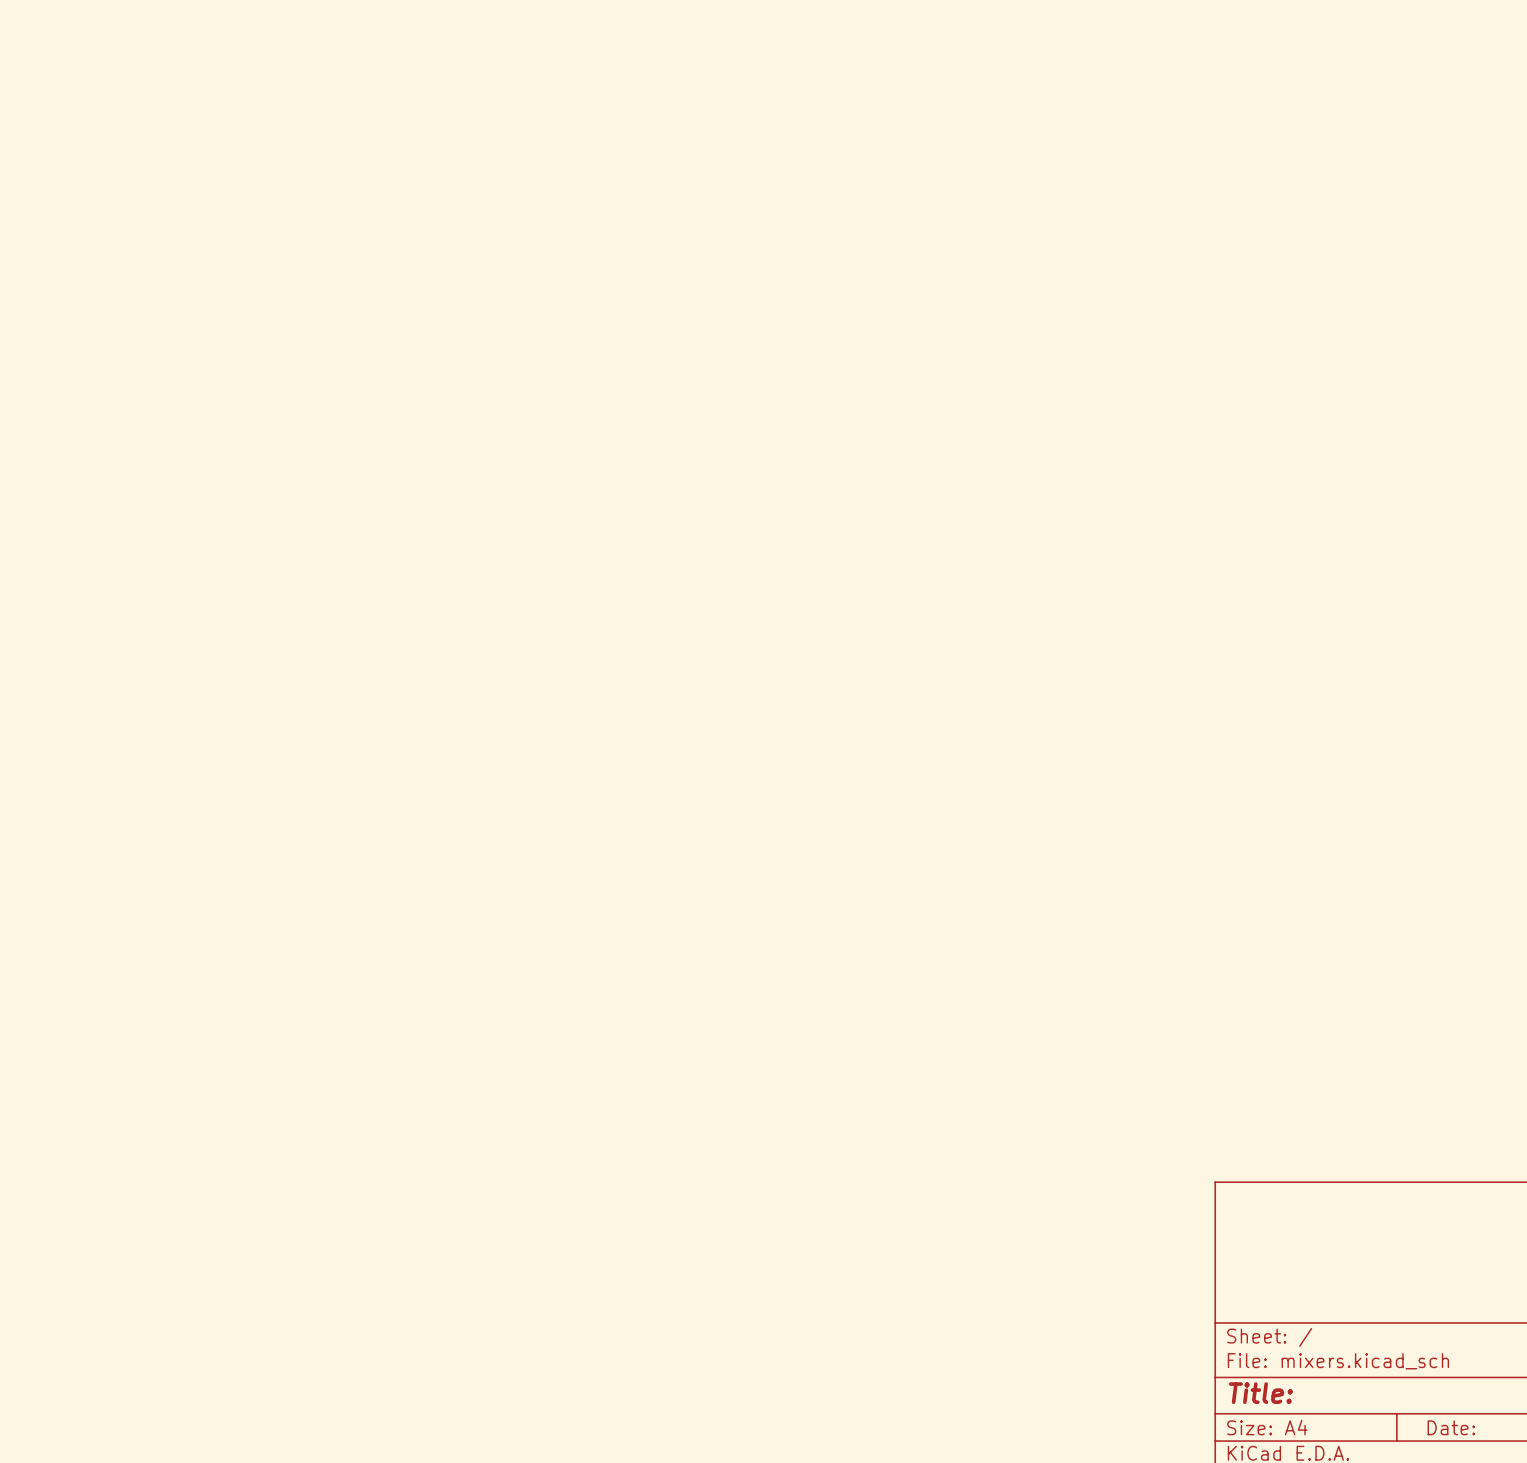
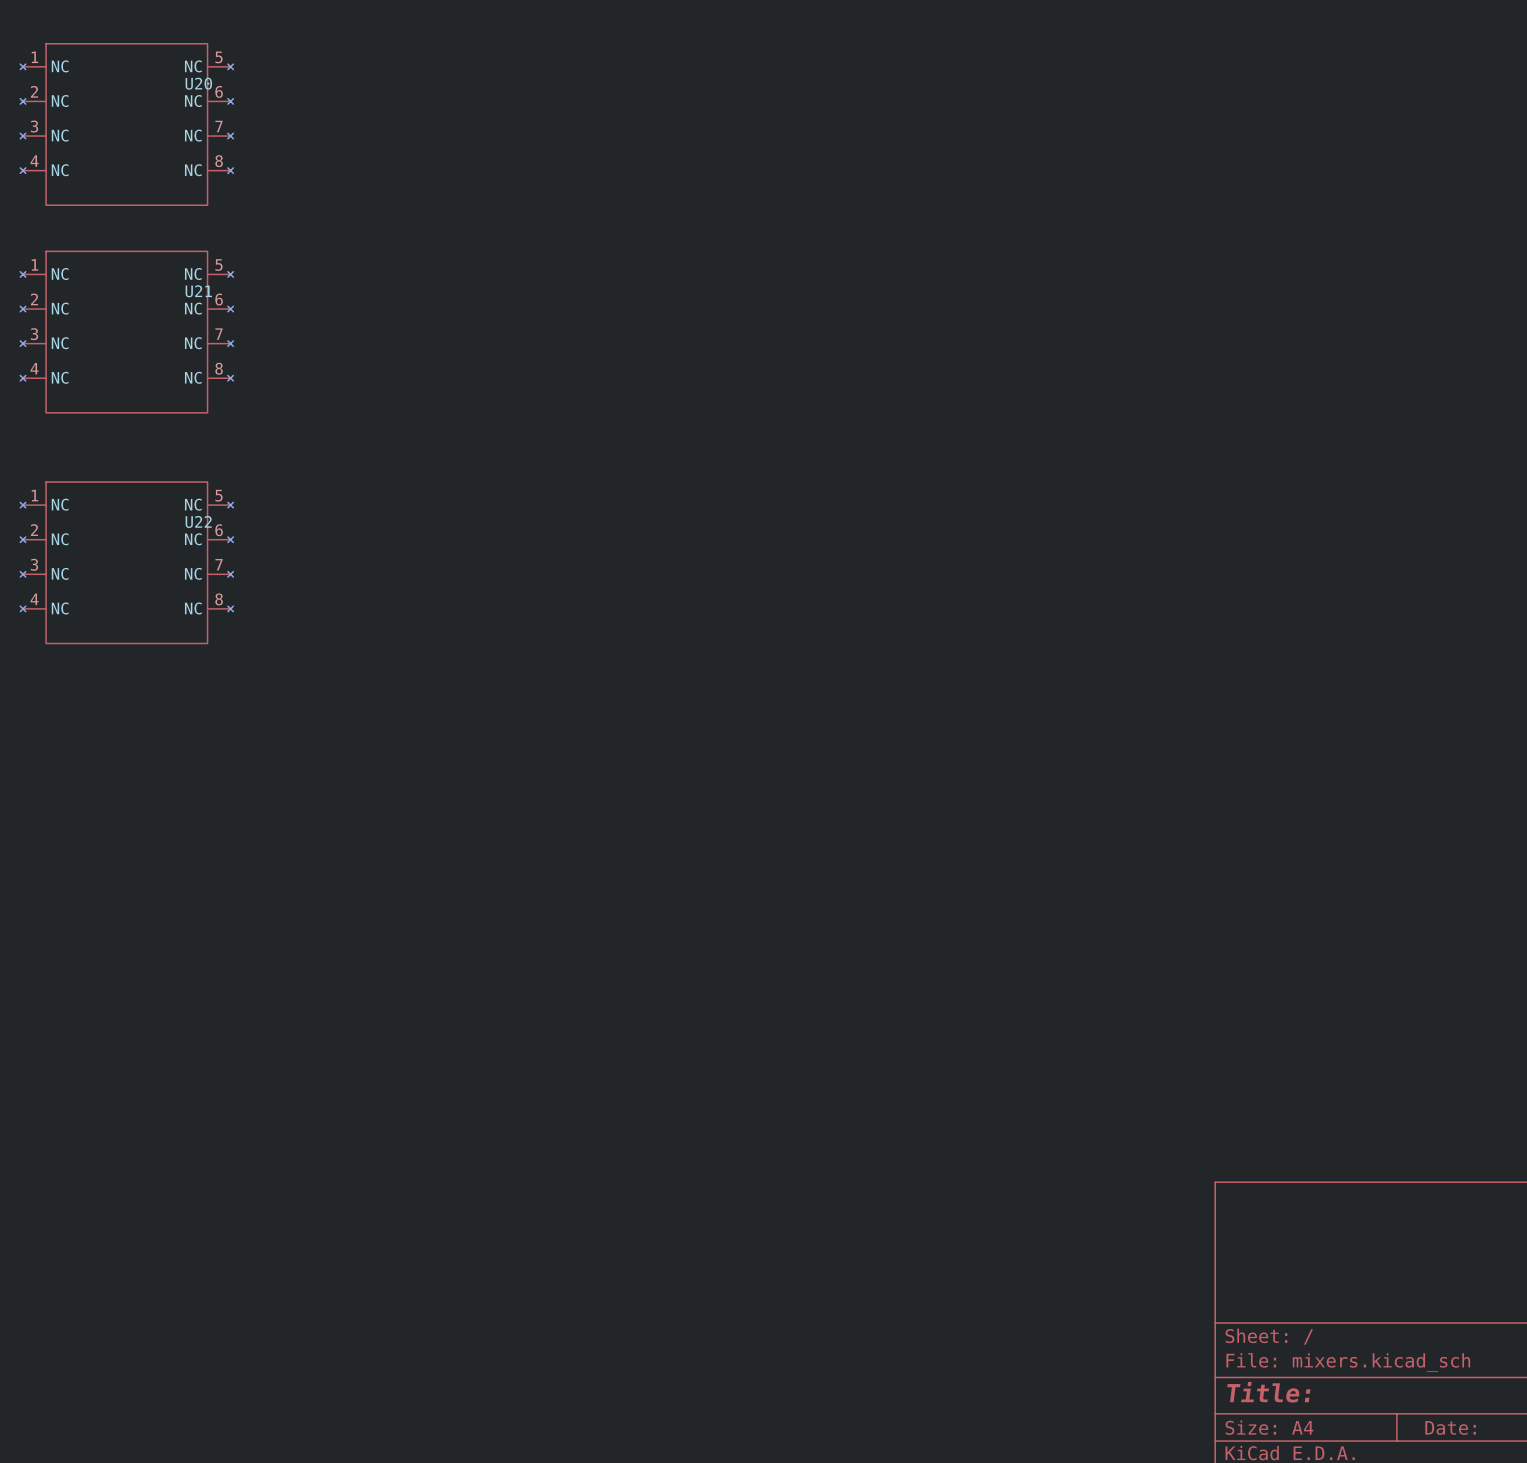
U20: none -> (126, 124)
U21: none -> (126, 332)
U22: none -> (126, 562)

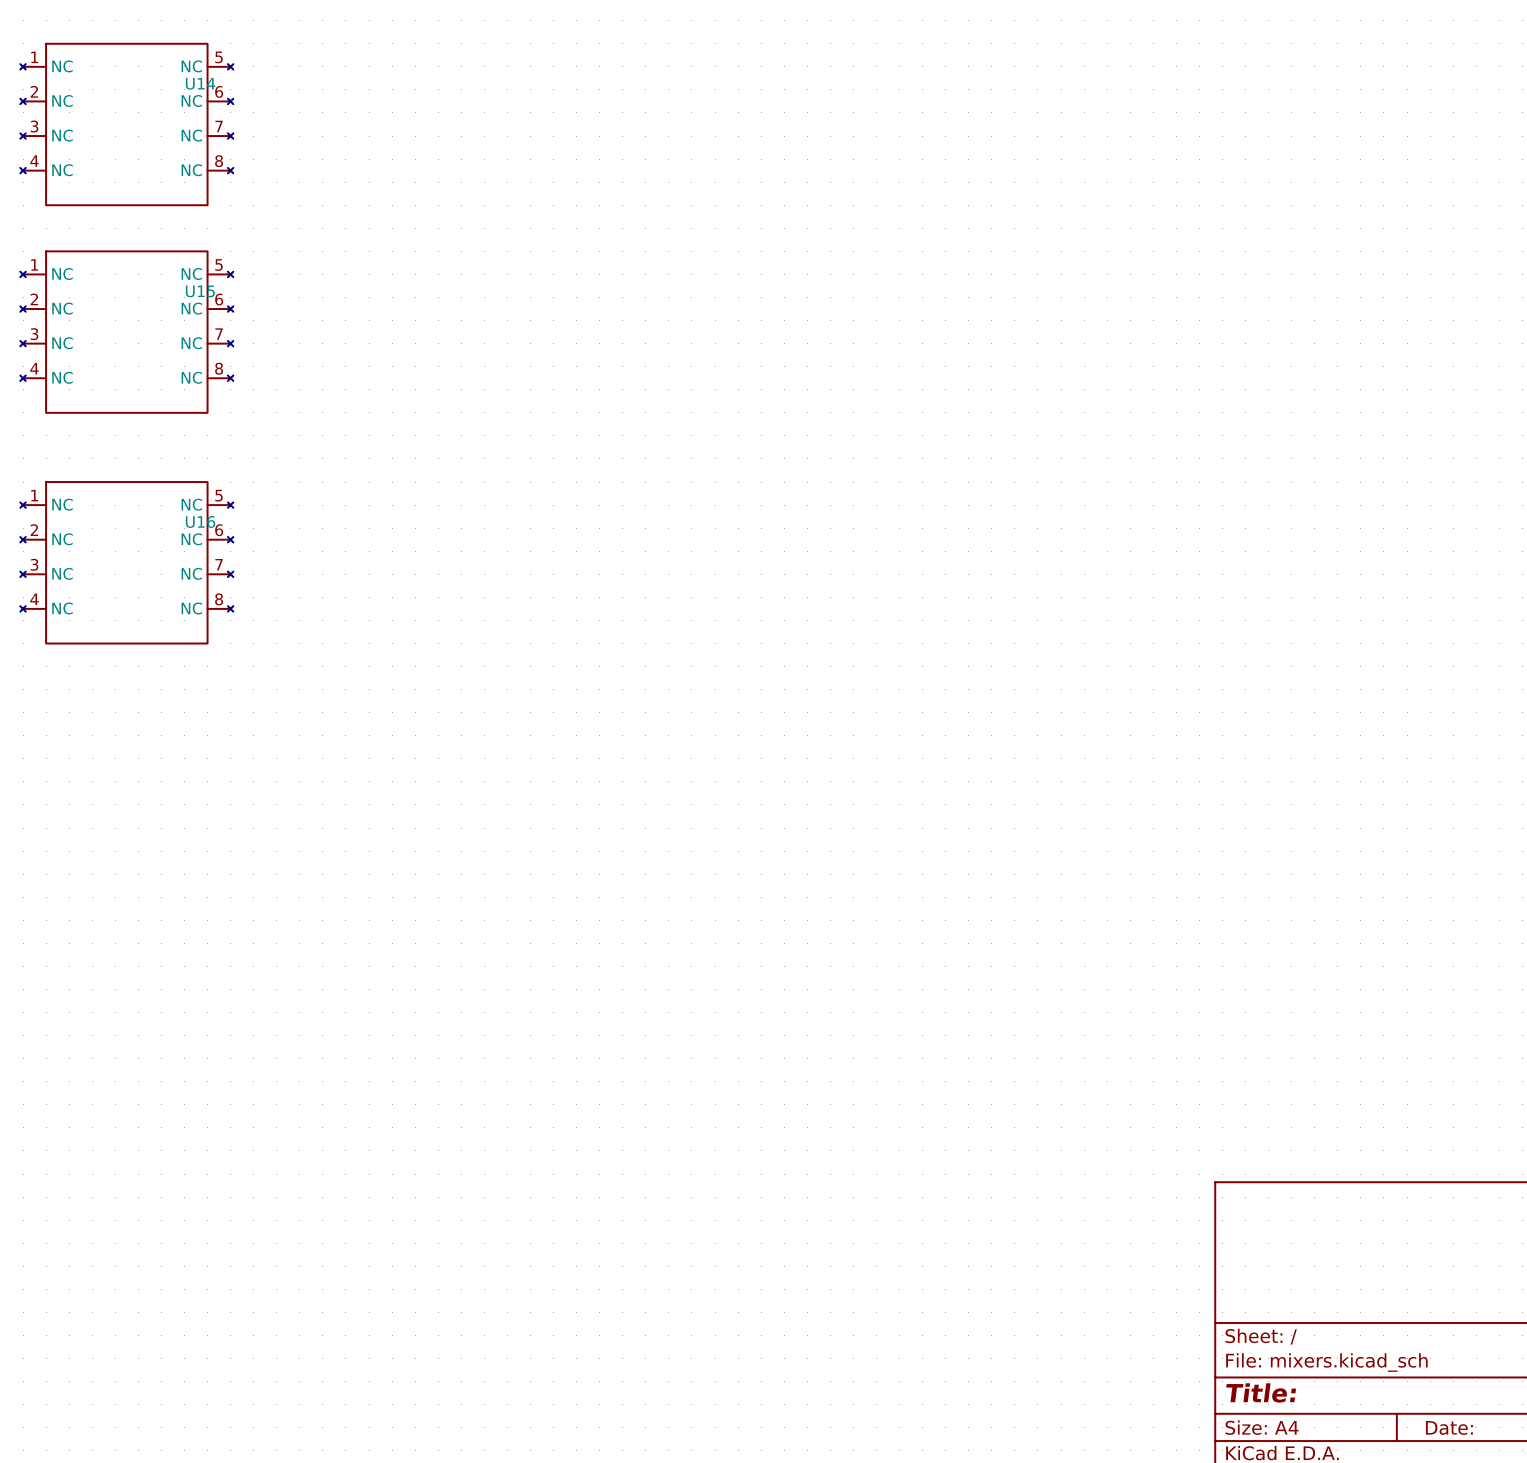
U20 name: U20 (198, 83) -> U14 (200, 83)
U21 name: U21 (198, 291) -> U15 (200, 291)
U22 name: U22 (198, 521) -> U16 (200, 521)

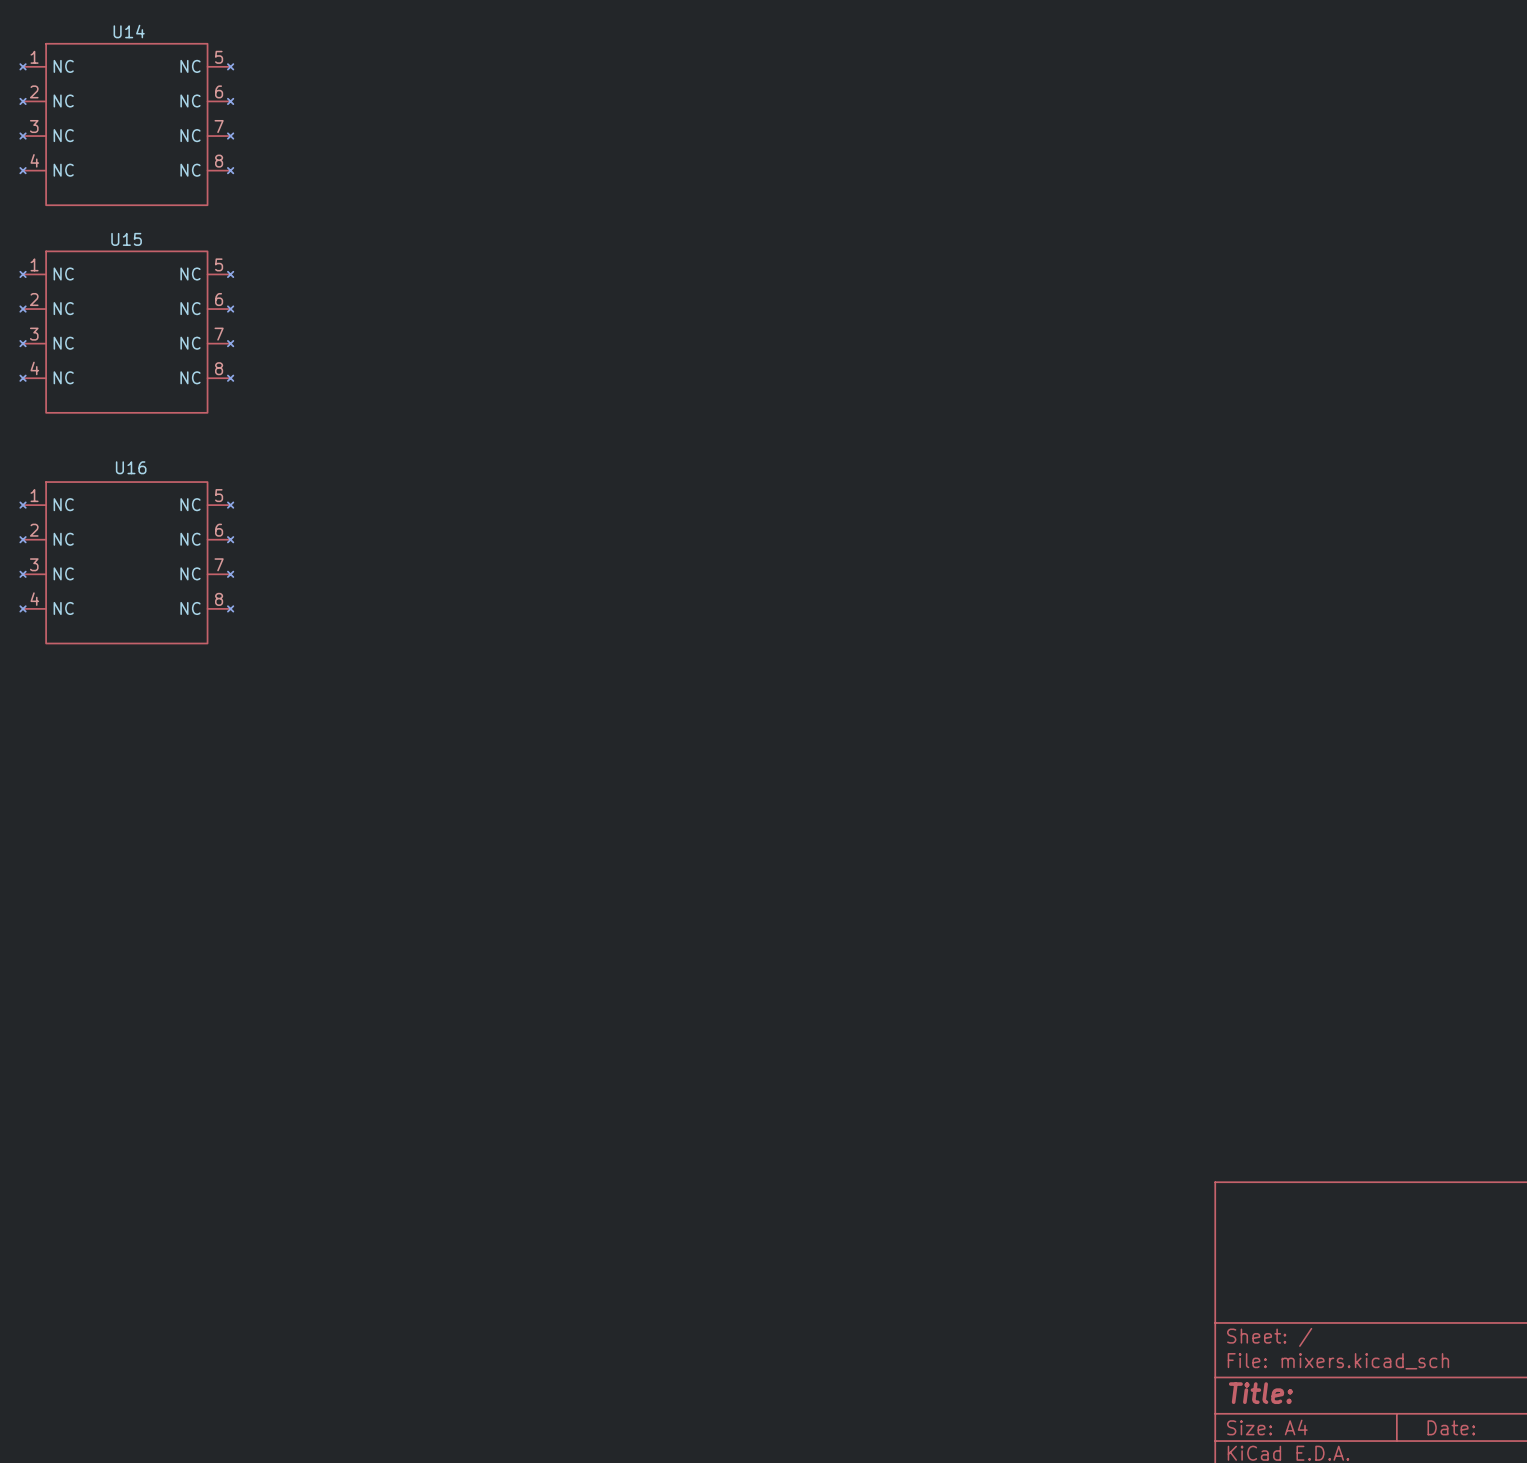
U14 name position: U14 (200, 83) -> U14 (129, 31)
U15 name position: U15 (200, 291) -> U15 (126, 239)
U16 name position: U16 (200, 521) -> U16 (131, 467)

